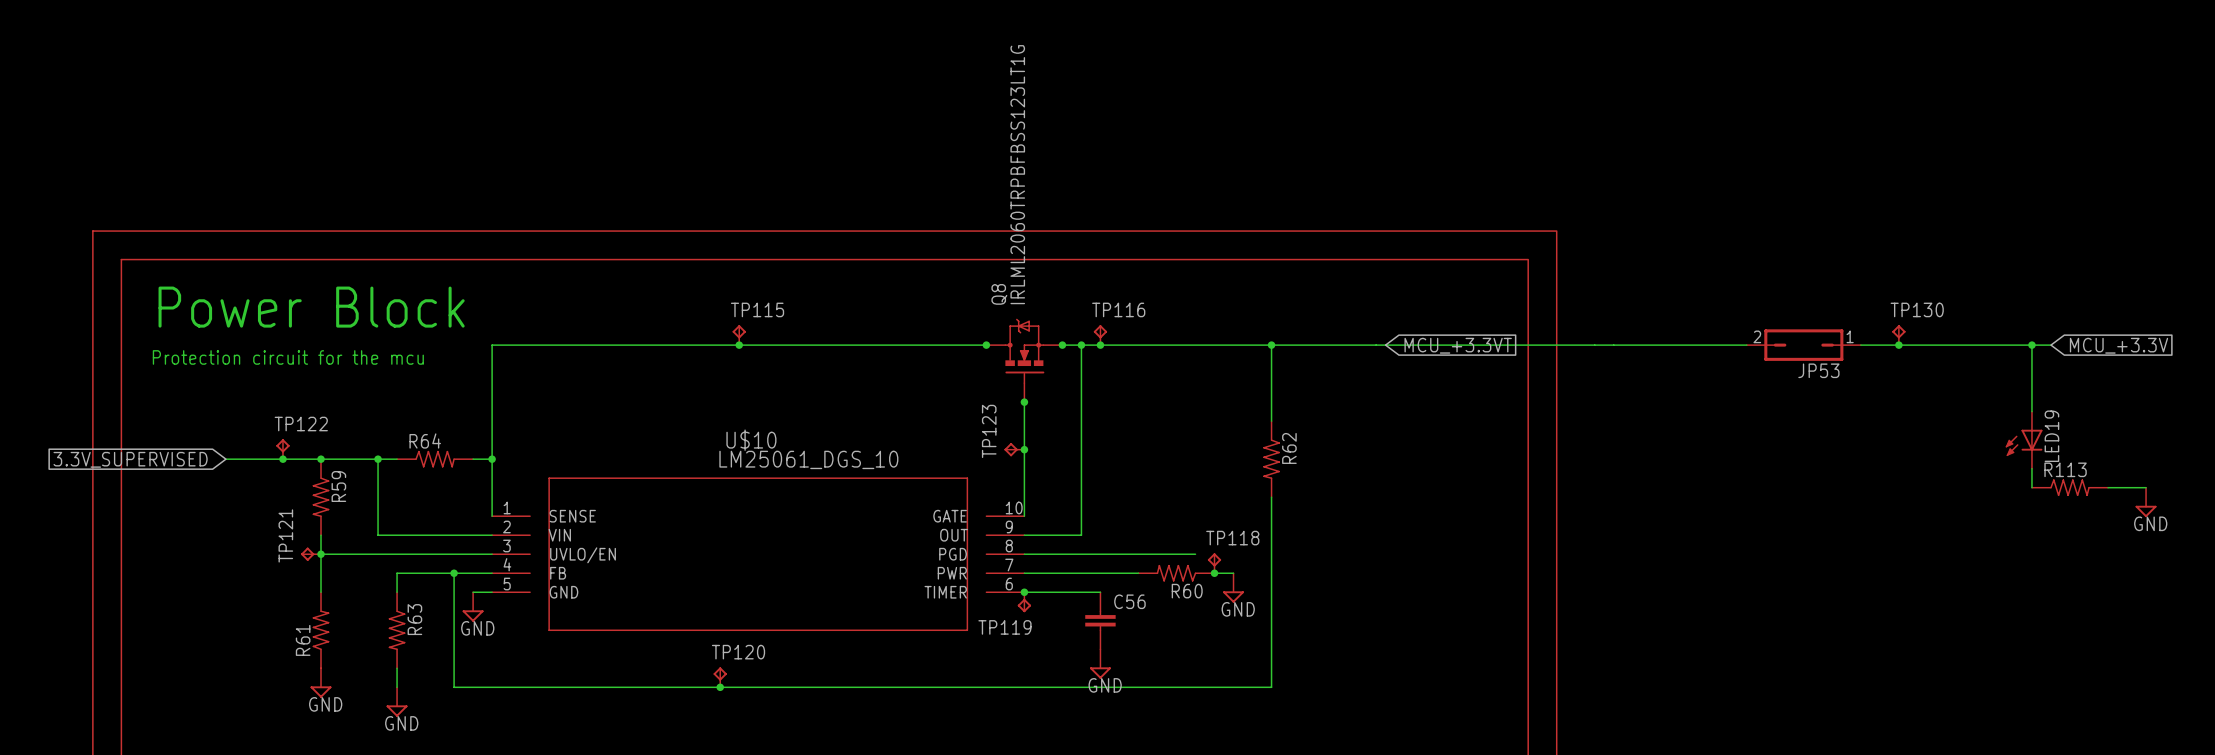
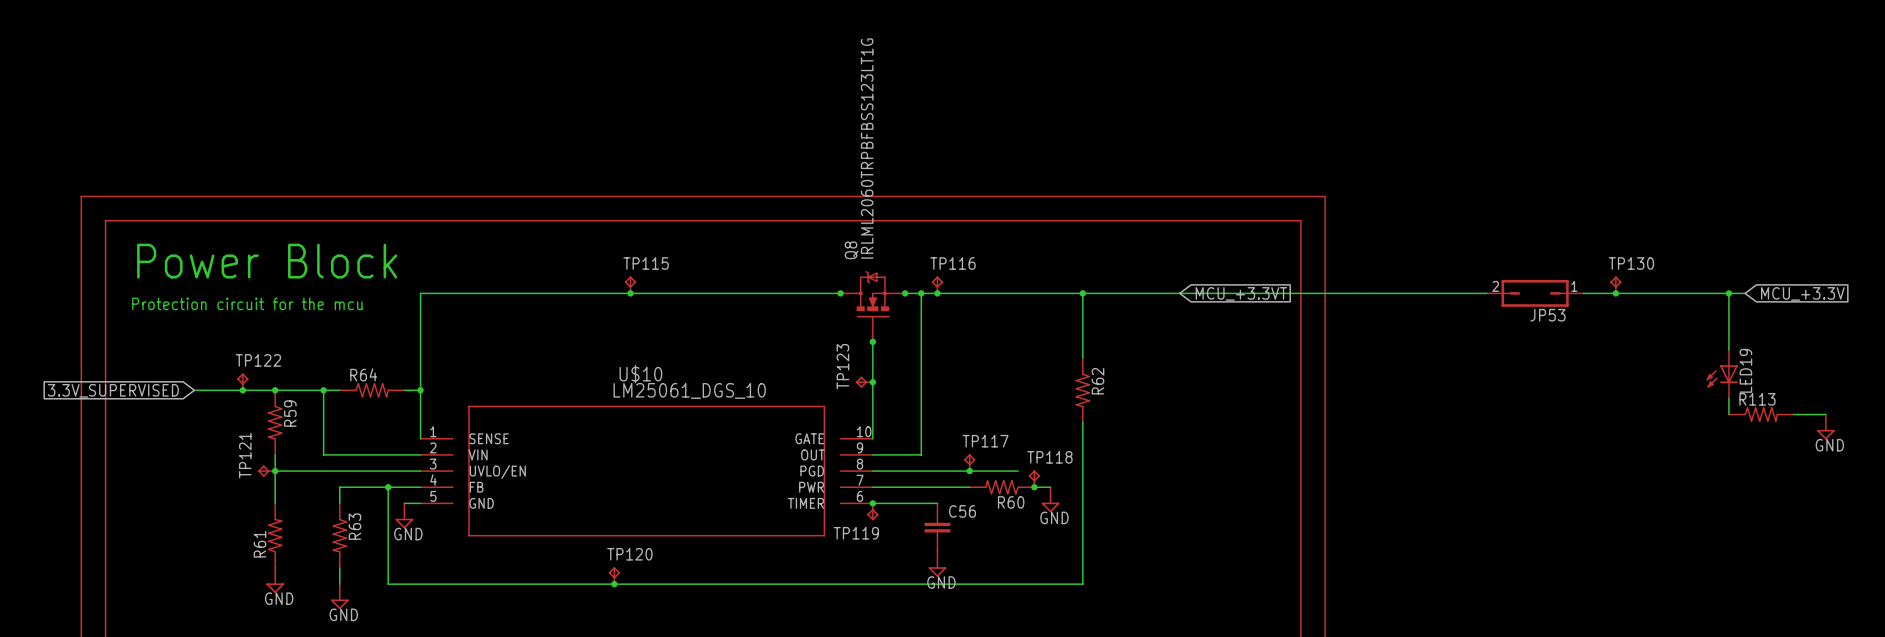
TP117: none -> (969, 462)
junction: none -> (969, 471)

